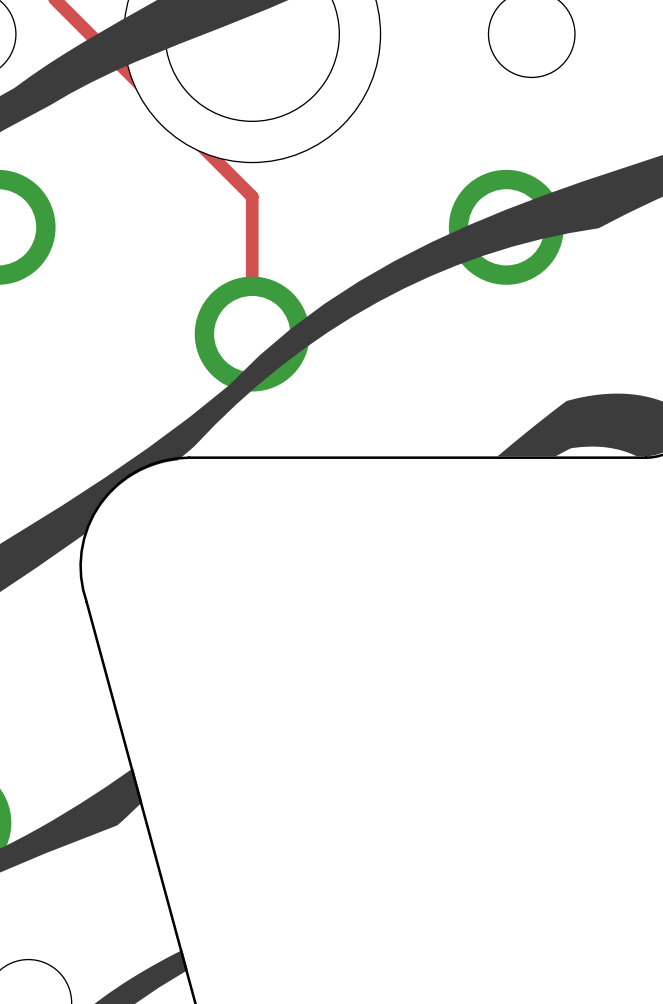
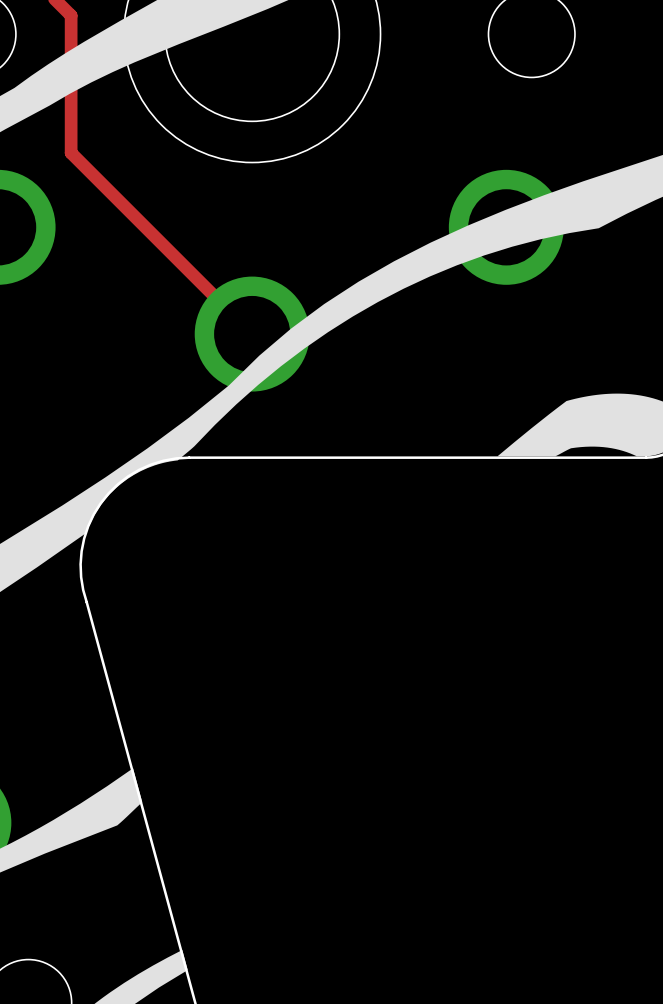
top track: (71, 15) (252, 196) (252, 334) -> (71, 15) (71, 152) (252, 334)

